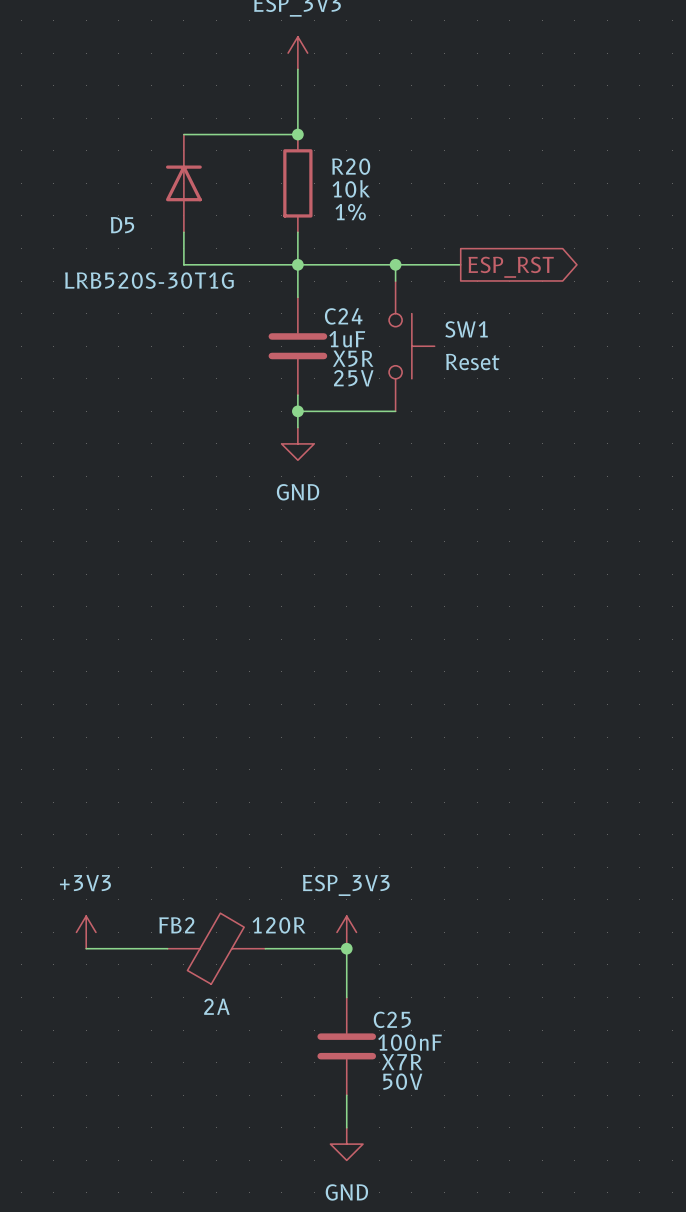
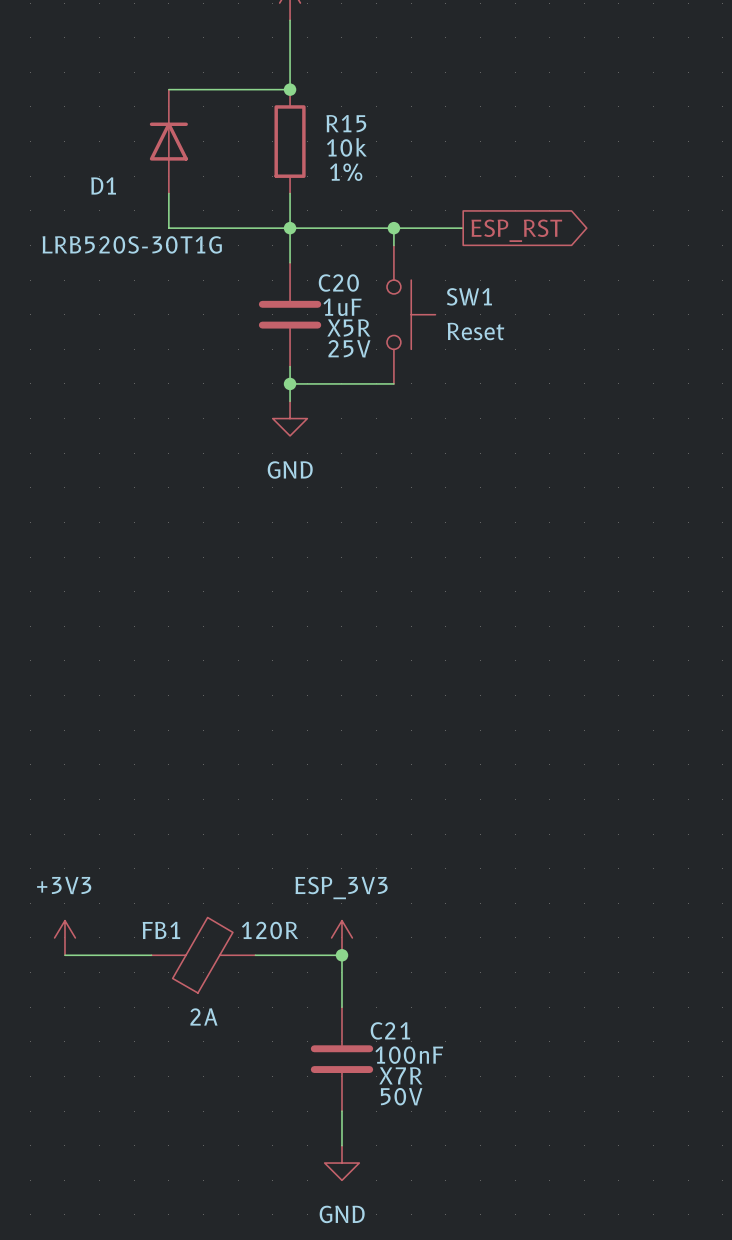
R20 name: R20 (351, 166) -> R15 (346, 123)
D5 name: D5 (122, 225) -> D1 (103, 185)
C24 name: C24 (343, 316) -> C20 (338, 283)
FB2 name: FB2 (176, 925) -> FB1 (161, 930)
C25 name: C25 (392, 1019) -> C21 (390, 1030)

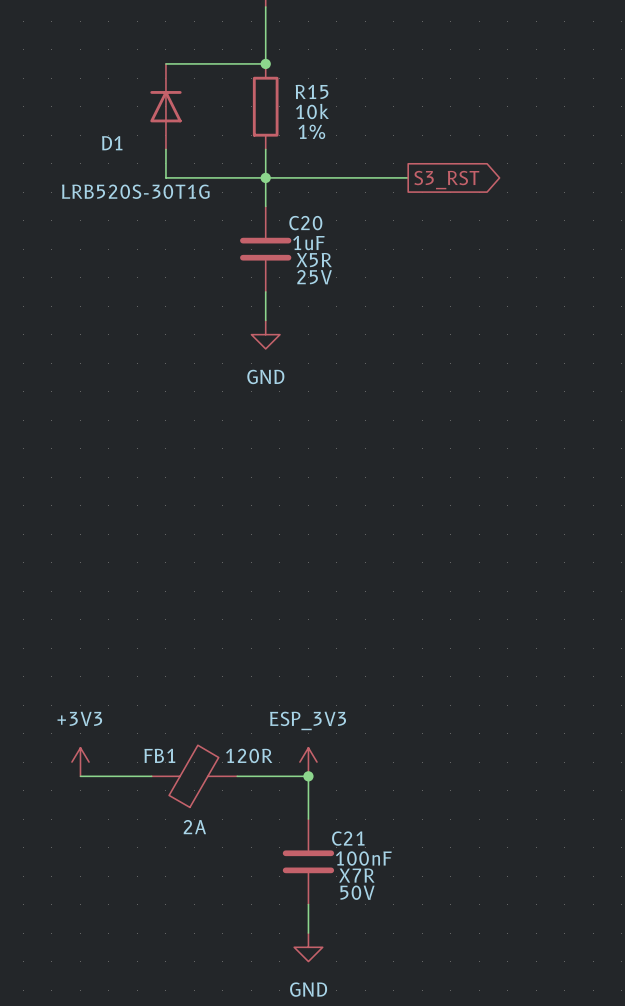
wire: (393, 228) (393, 245) -> none
junction: (393, 228) -> none
global label: ESP_RST (516, 230) -> S3_RST (446, 180)
SW1: Reset (411, 314) -> none
wire: (290, 383) (393, 383) -> none
junction: (290, 383) -> none

